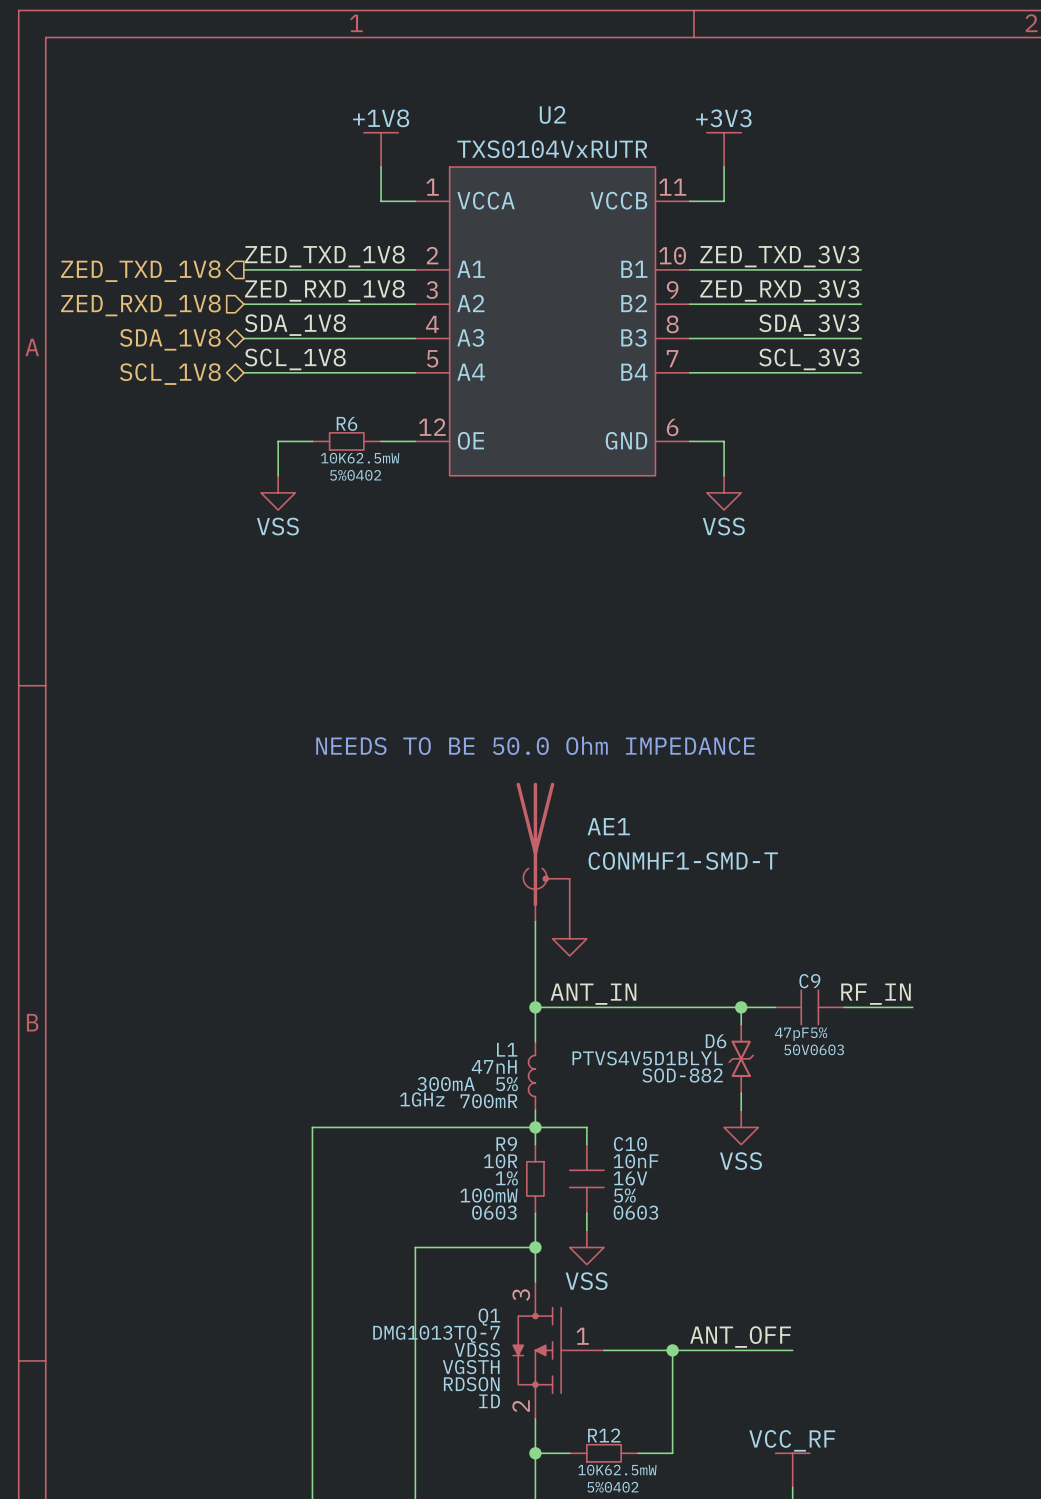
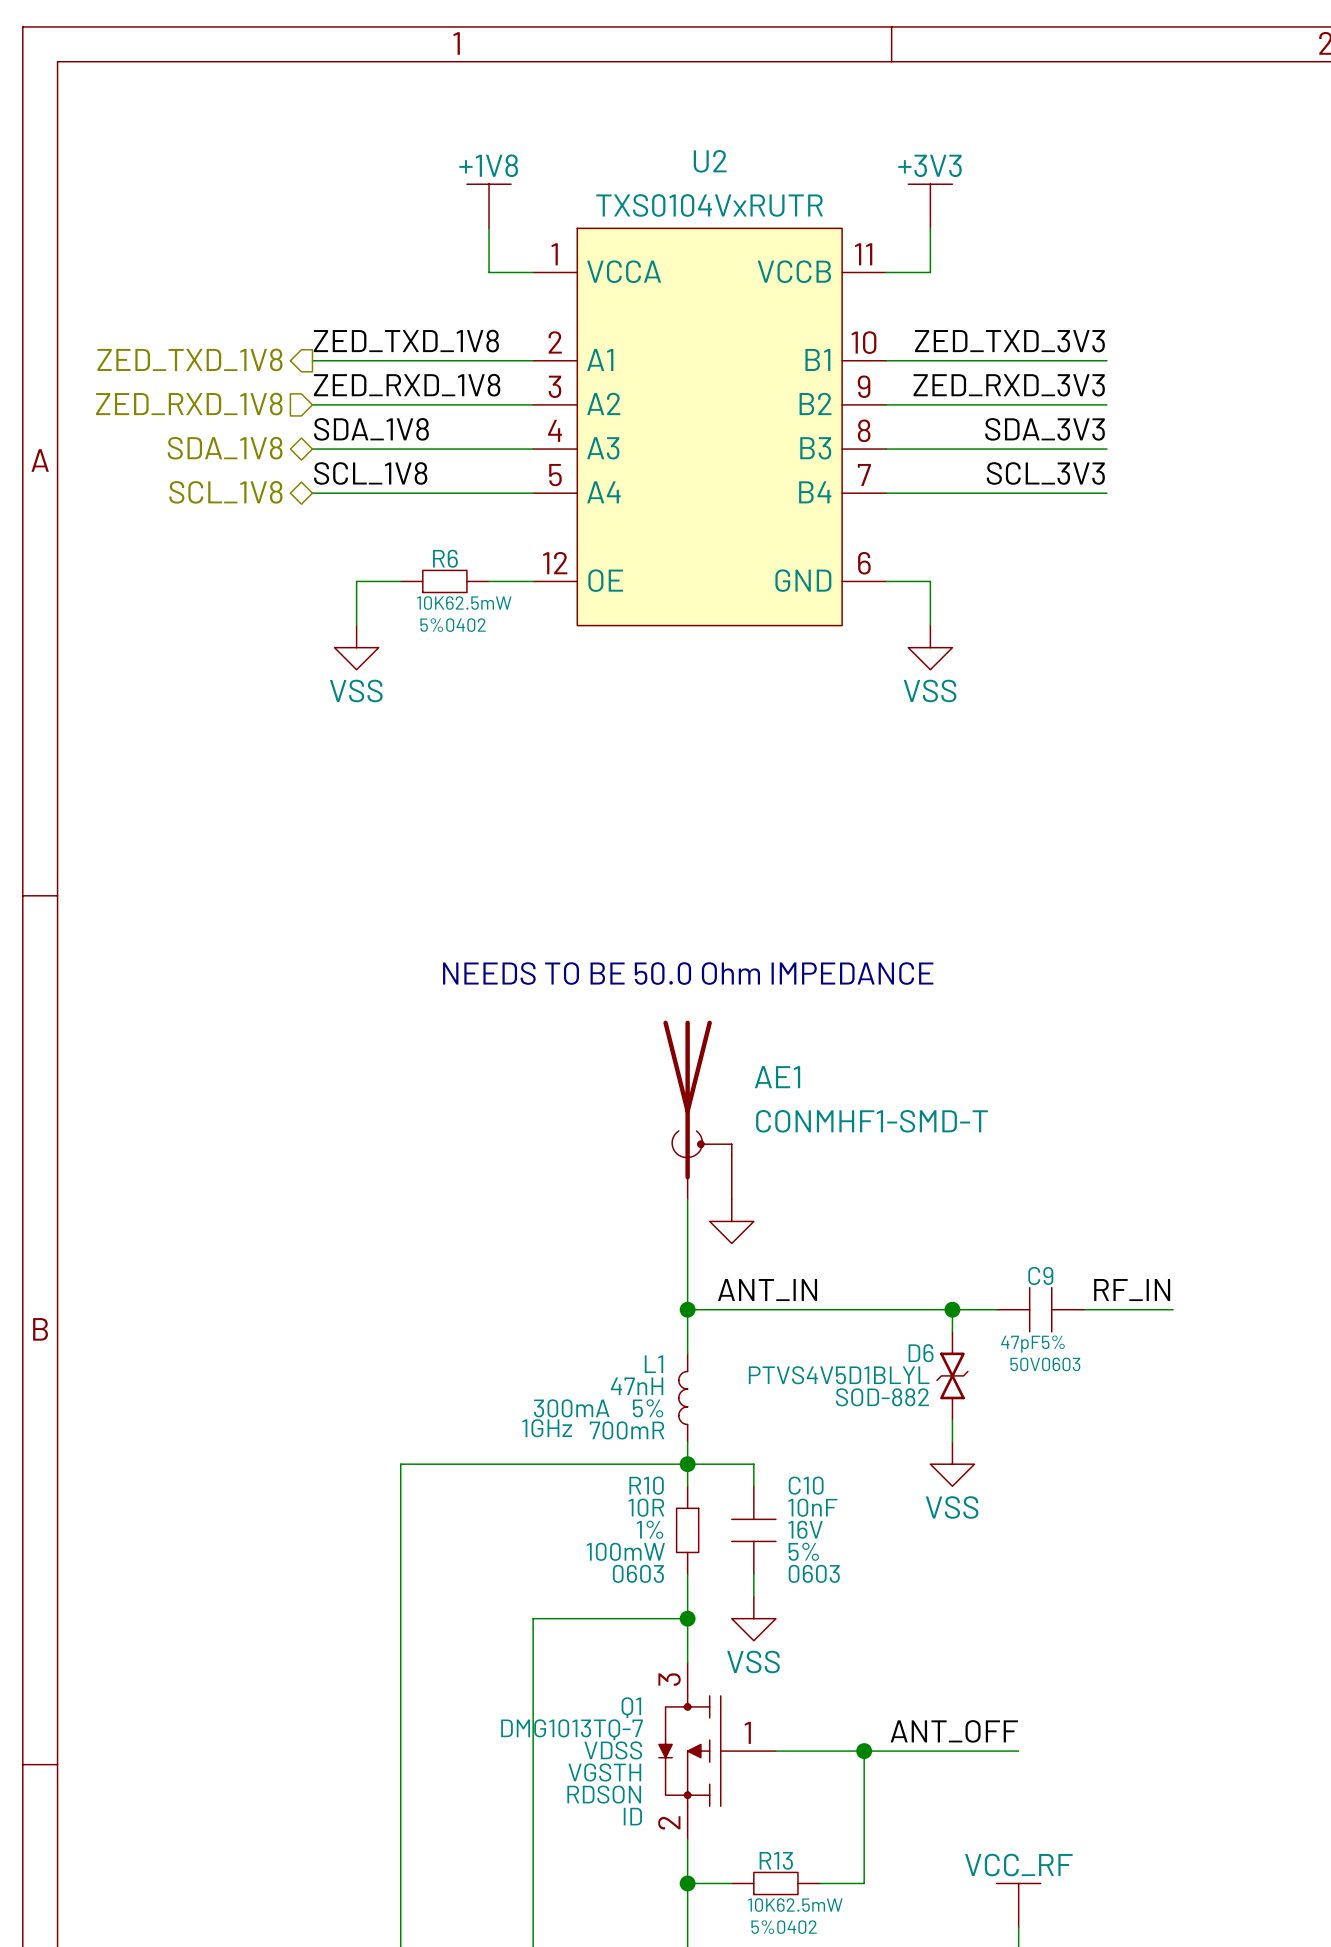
R9 name: R9 (506, 1143) -> R10 (646, 1485)
R12 name: R12 (604, 1435) -> R13 (776, 1860)

